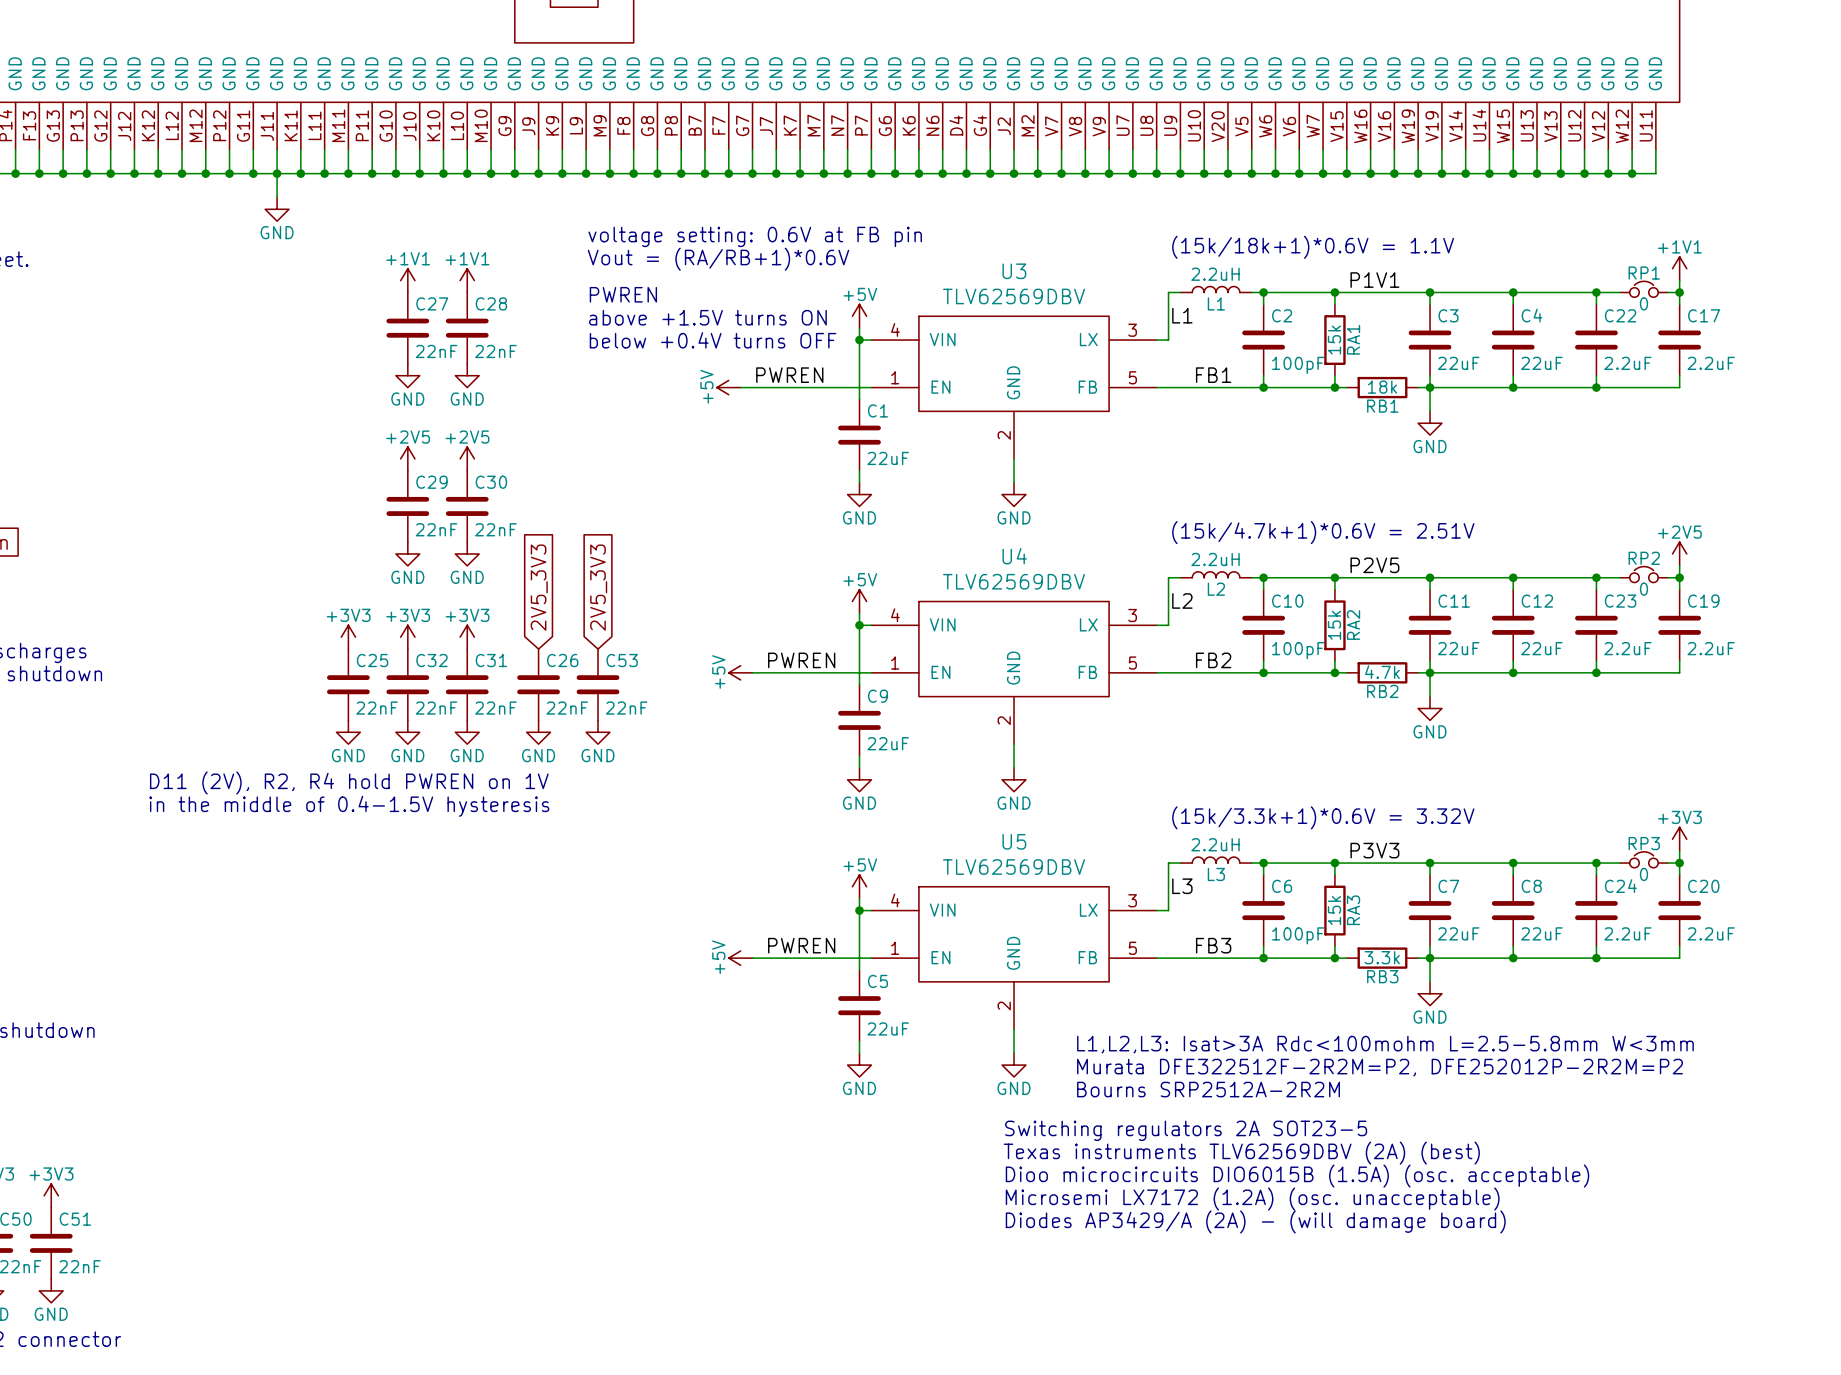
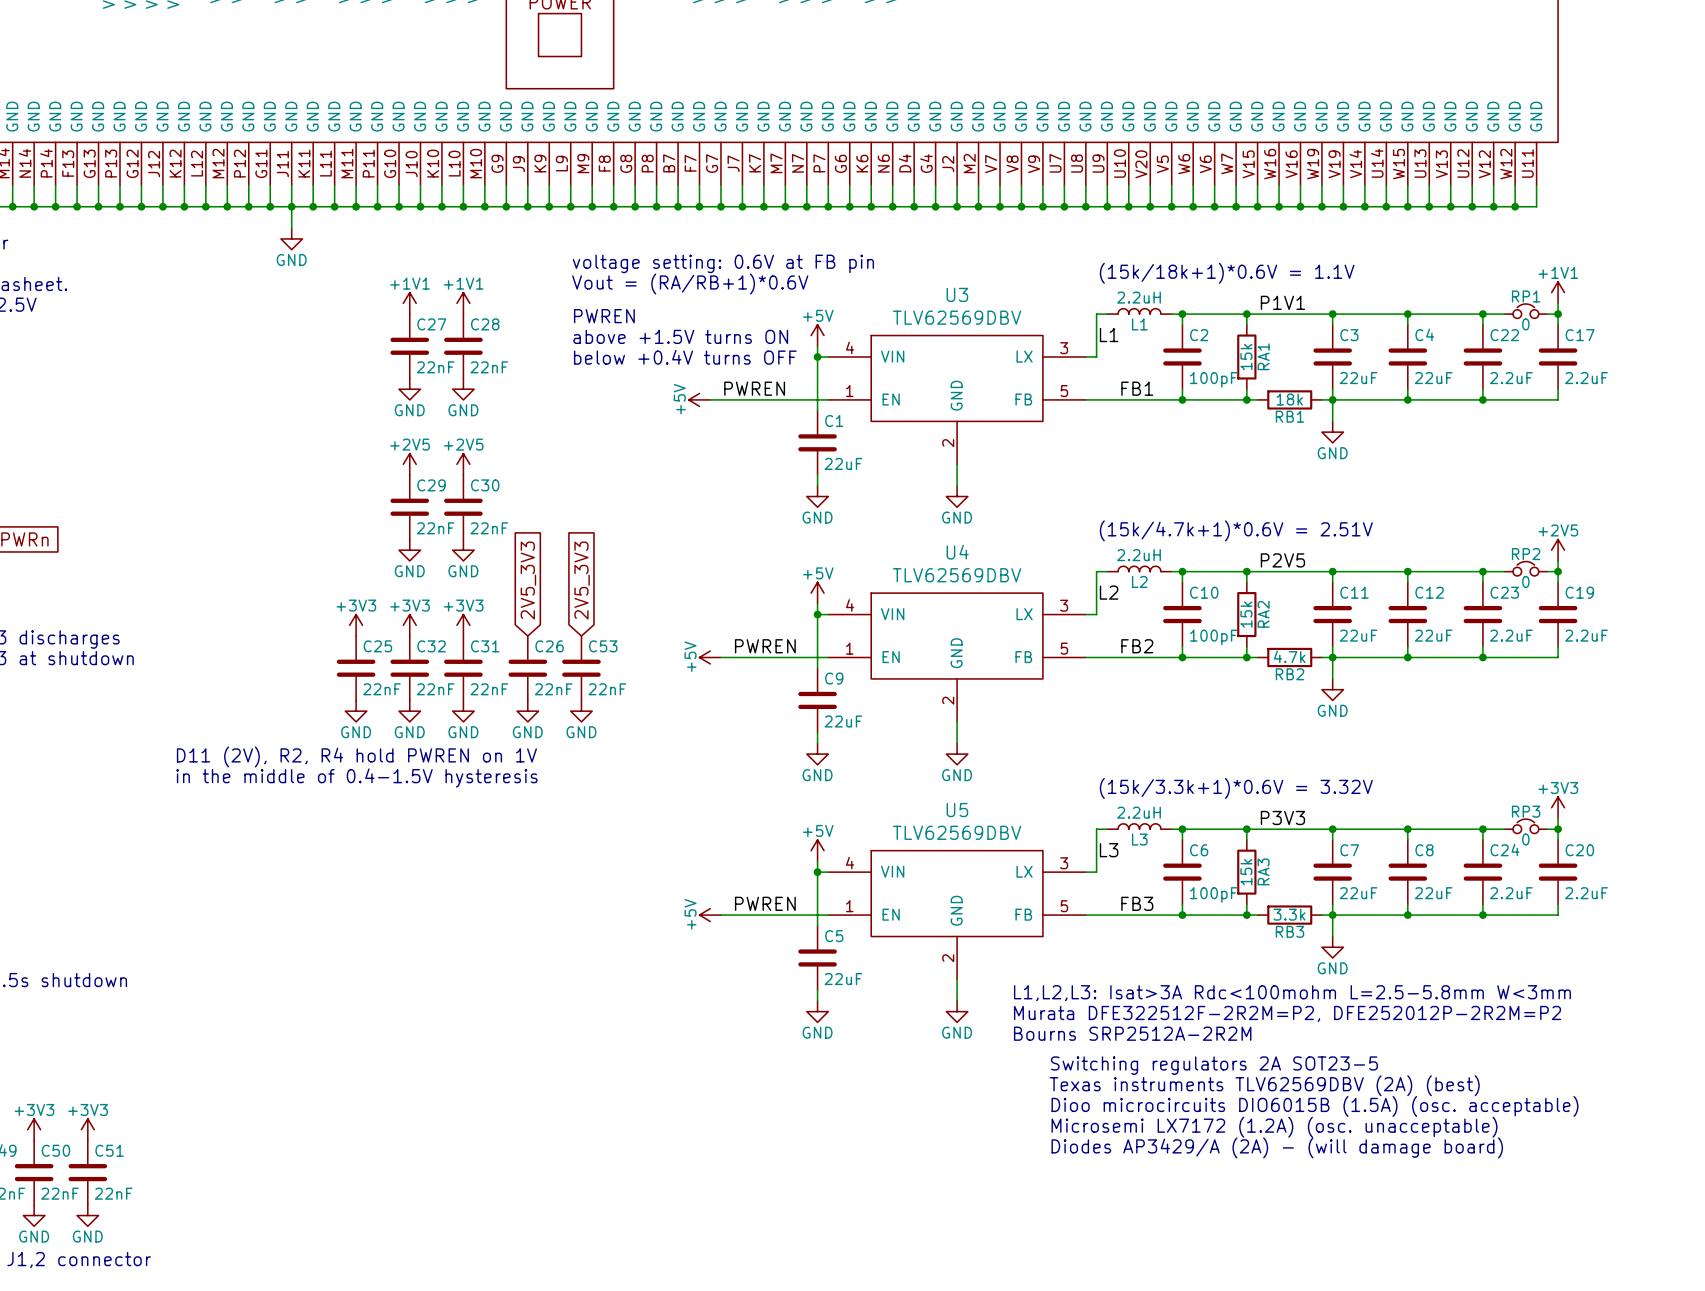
text position: Switching regulators 2A SOT23-5 (1186, 1130) -> Switching regulators 2A SOT23-5 (1214, 1065)
text position: Texas instruments TLV62569DBV (2A) (best) (1241, 1153) -> Texas instruments TLV62569DBV (2A) (best) (1264, 1085)
text position: Dioo microcircuits DIO6015B (1.5A) (osc. acceptable) (1297, 1176) -> Dioo microcircuits DIO6015B (1.5A) (osc. acceptable) (1314, 1106)
text position: Microsemi LX7172 (1.2A) (osc. unacceptable) (1252, 1199) -> Microsemi LX7172 (1.2A) (osc. unacceptable) (1274, 1127)
text position: Diodes AP3429/A (2A) - (will damage board) (1255, 1221) -> Diodes AP3429/A (2A) - (will damage board) (1277, 1147)

